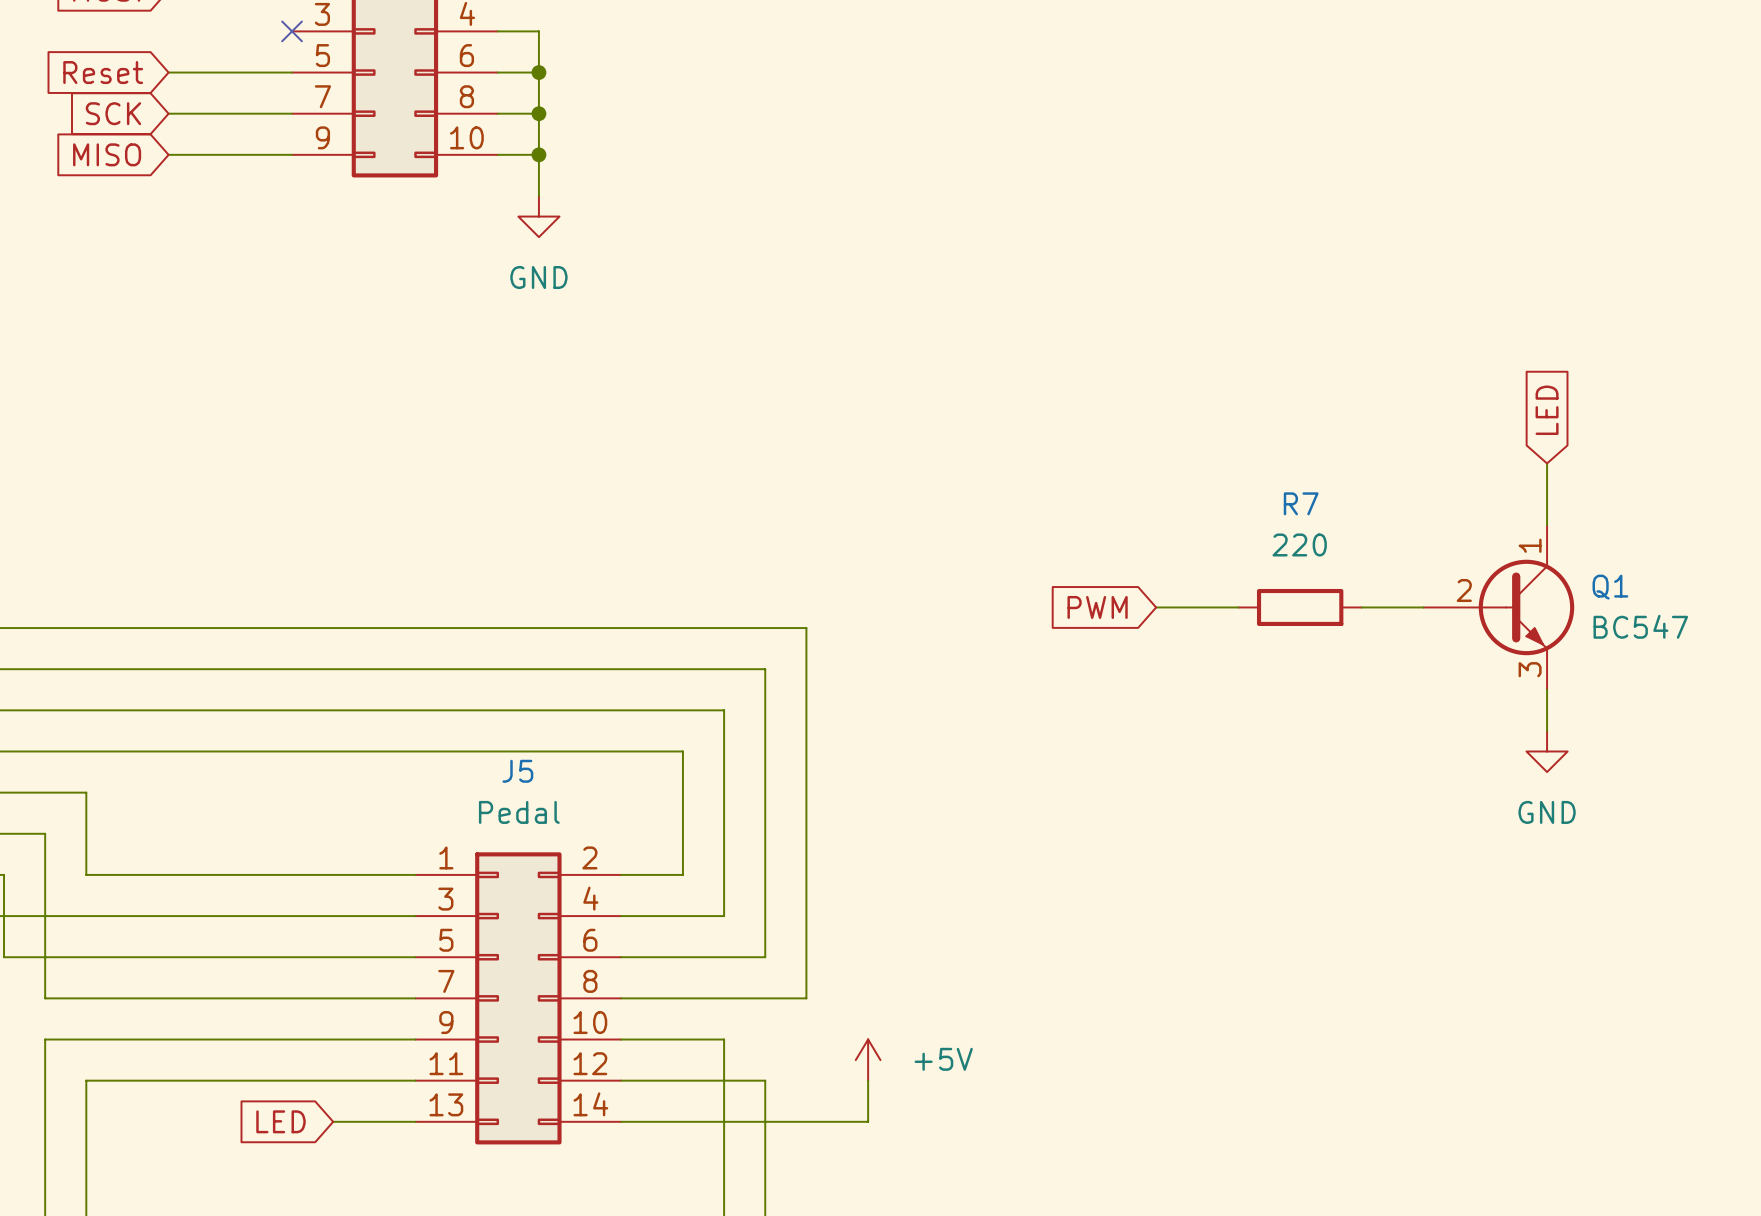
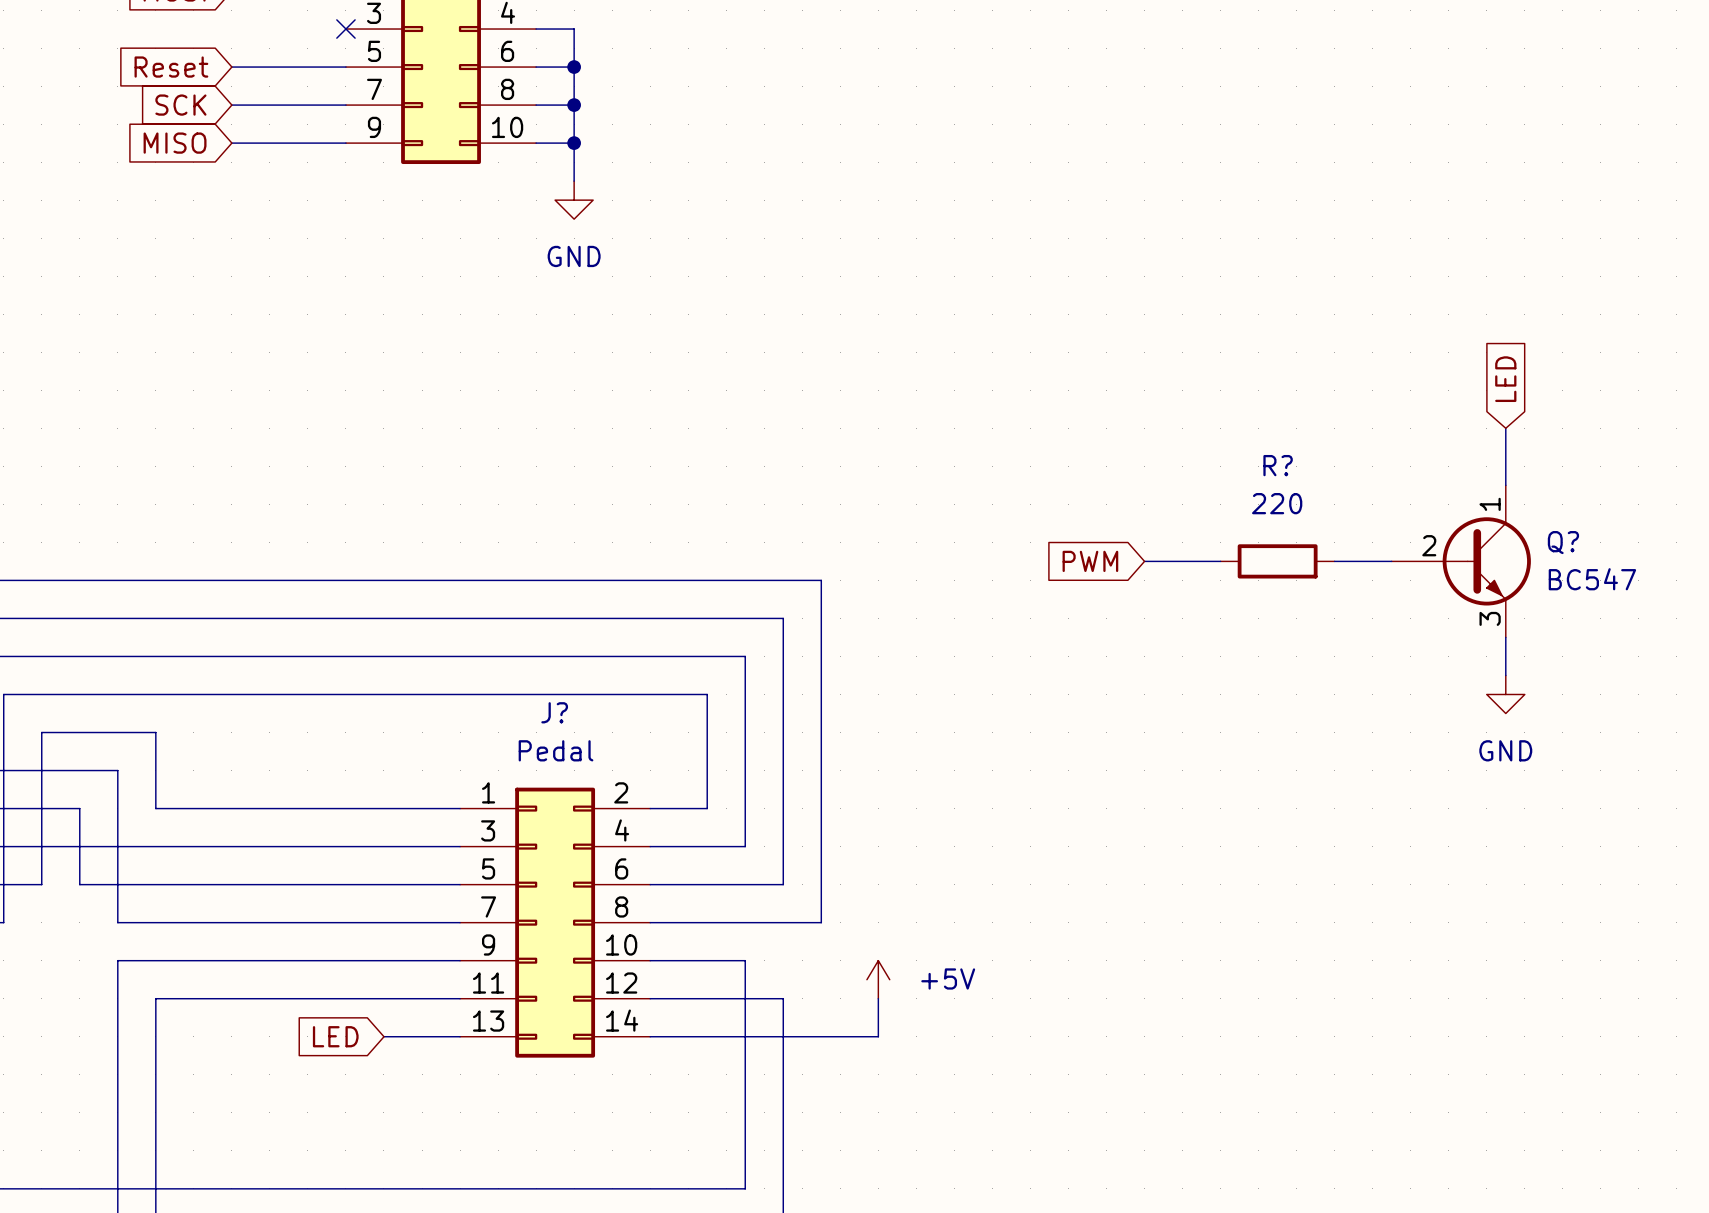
R7 name: R7 (1301, 503) -> R? (1278, 465)
Q1 name: Q1 (1610, 587) -> Q? (1563, 542)
J5 name: J5 (517, 771) -> J? (554, 712)

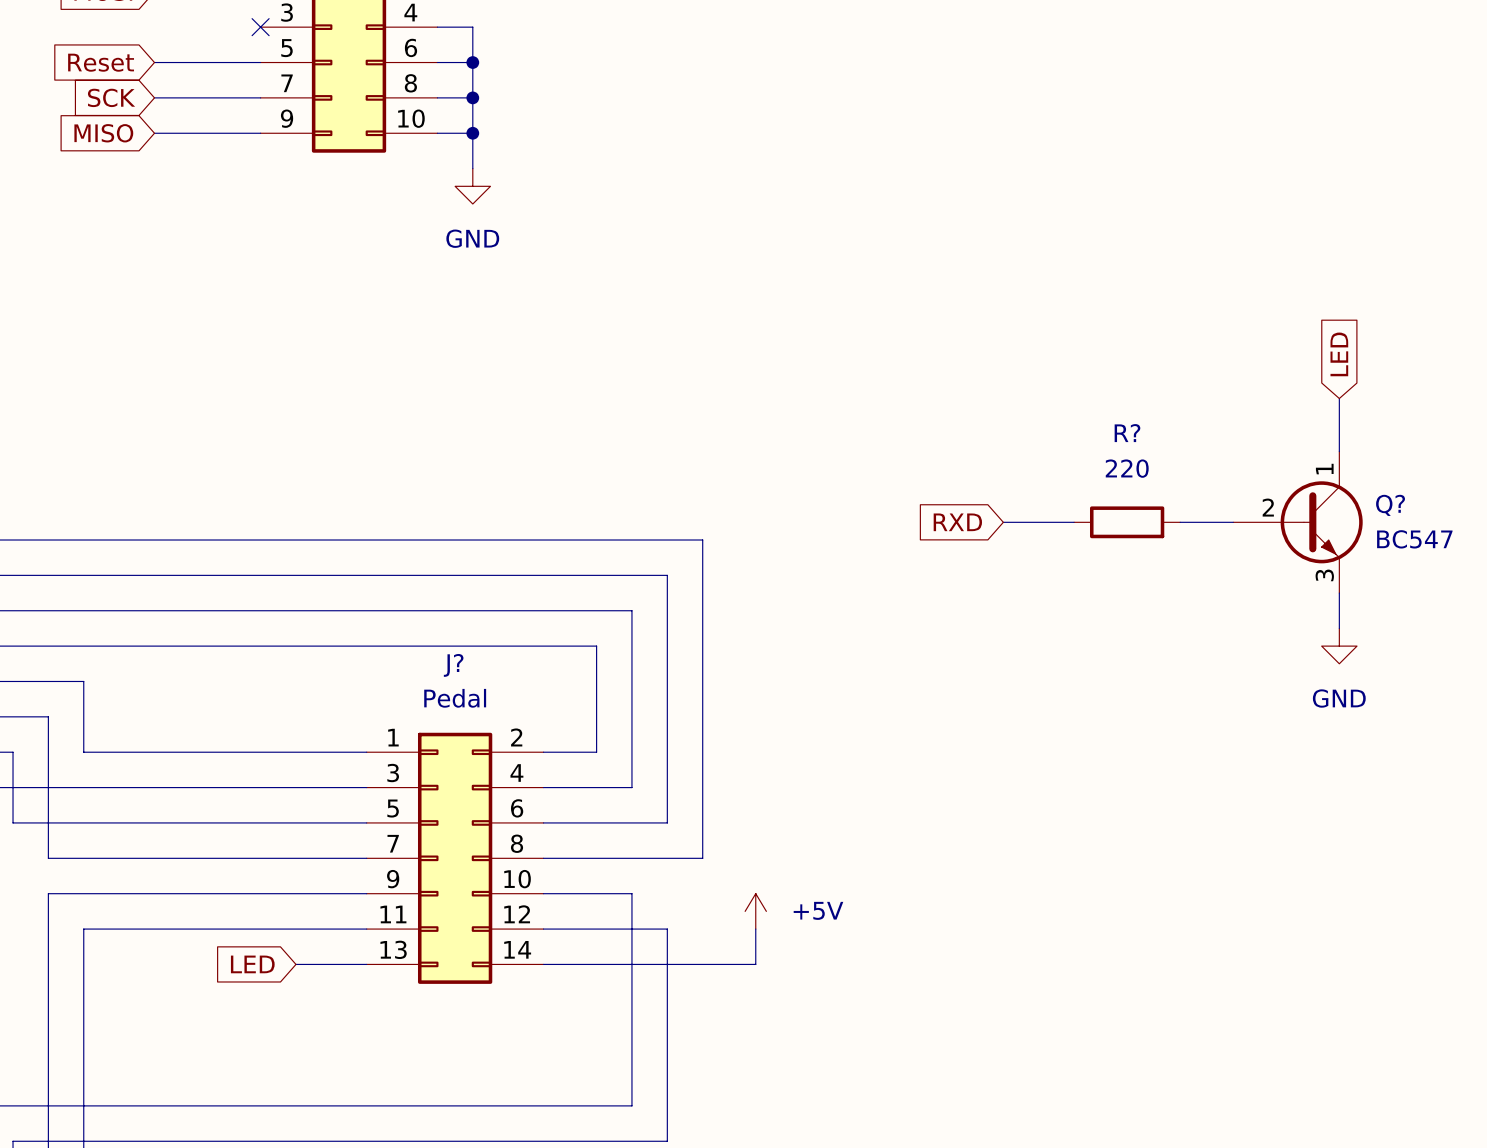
global label: PWM (1090, 561) -> RXD (957, 522)

